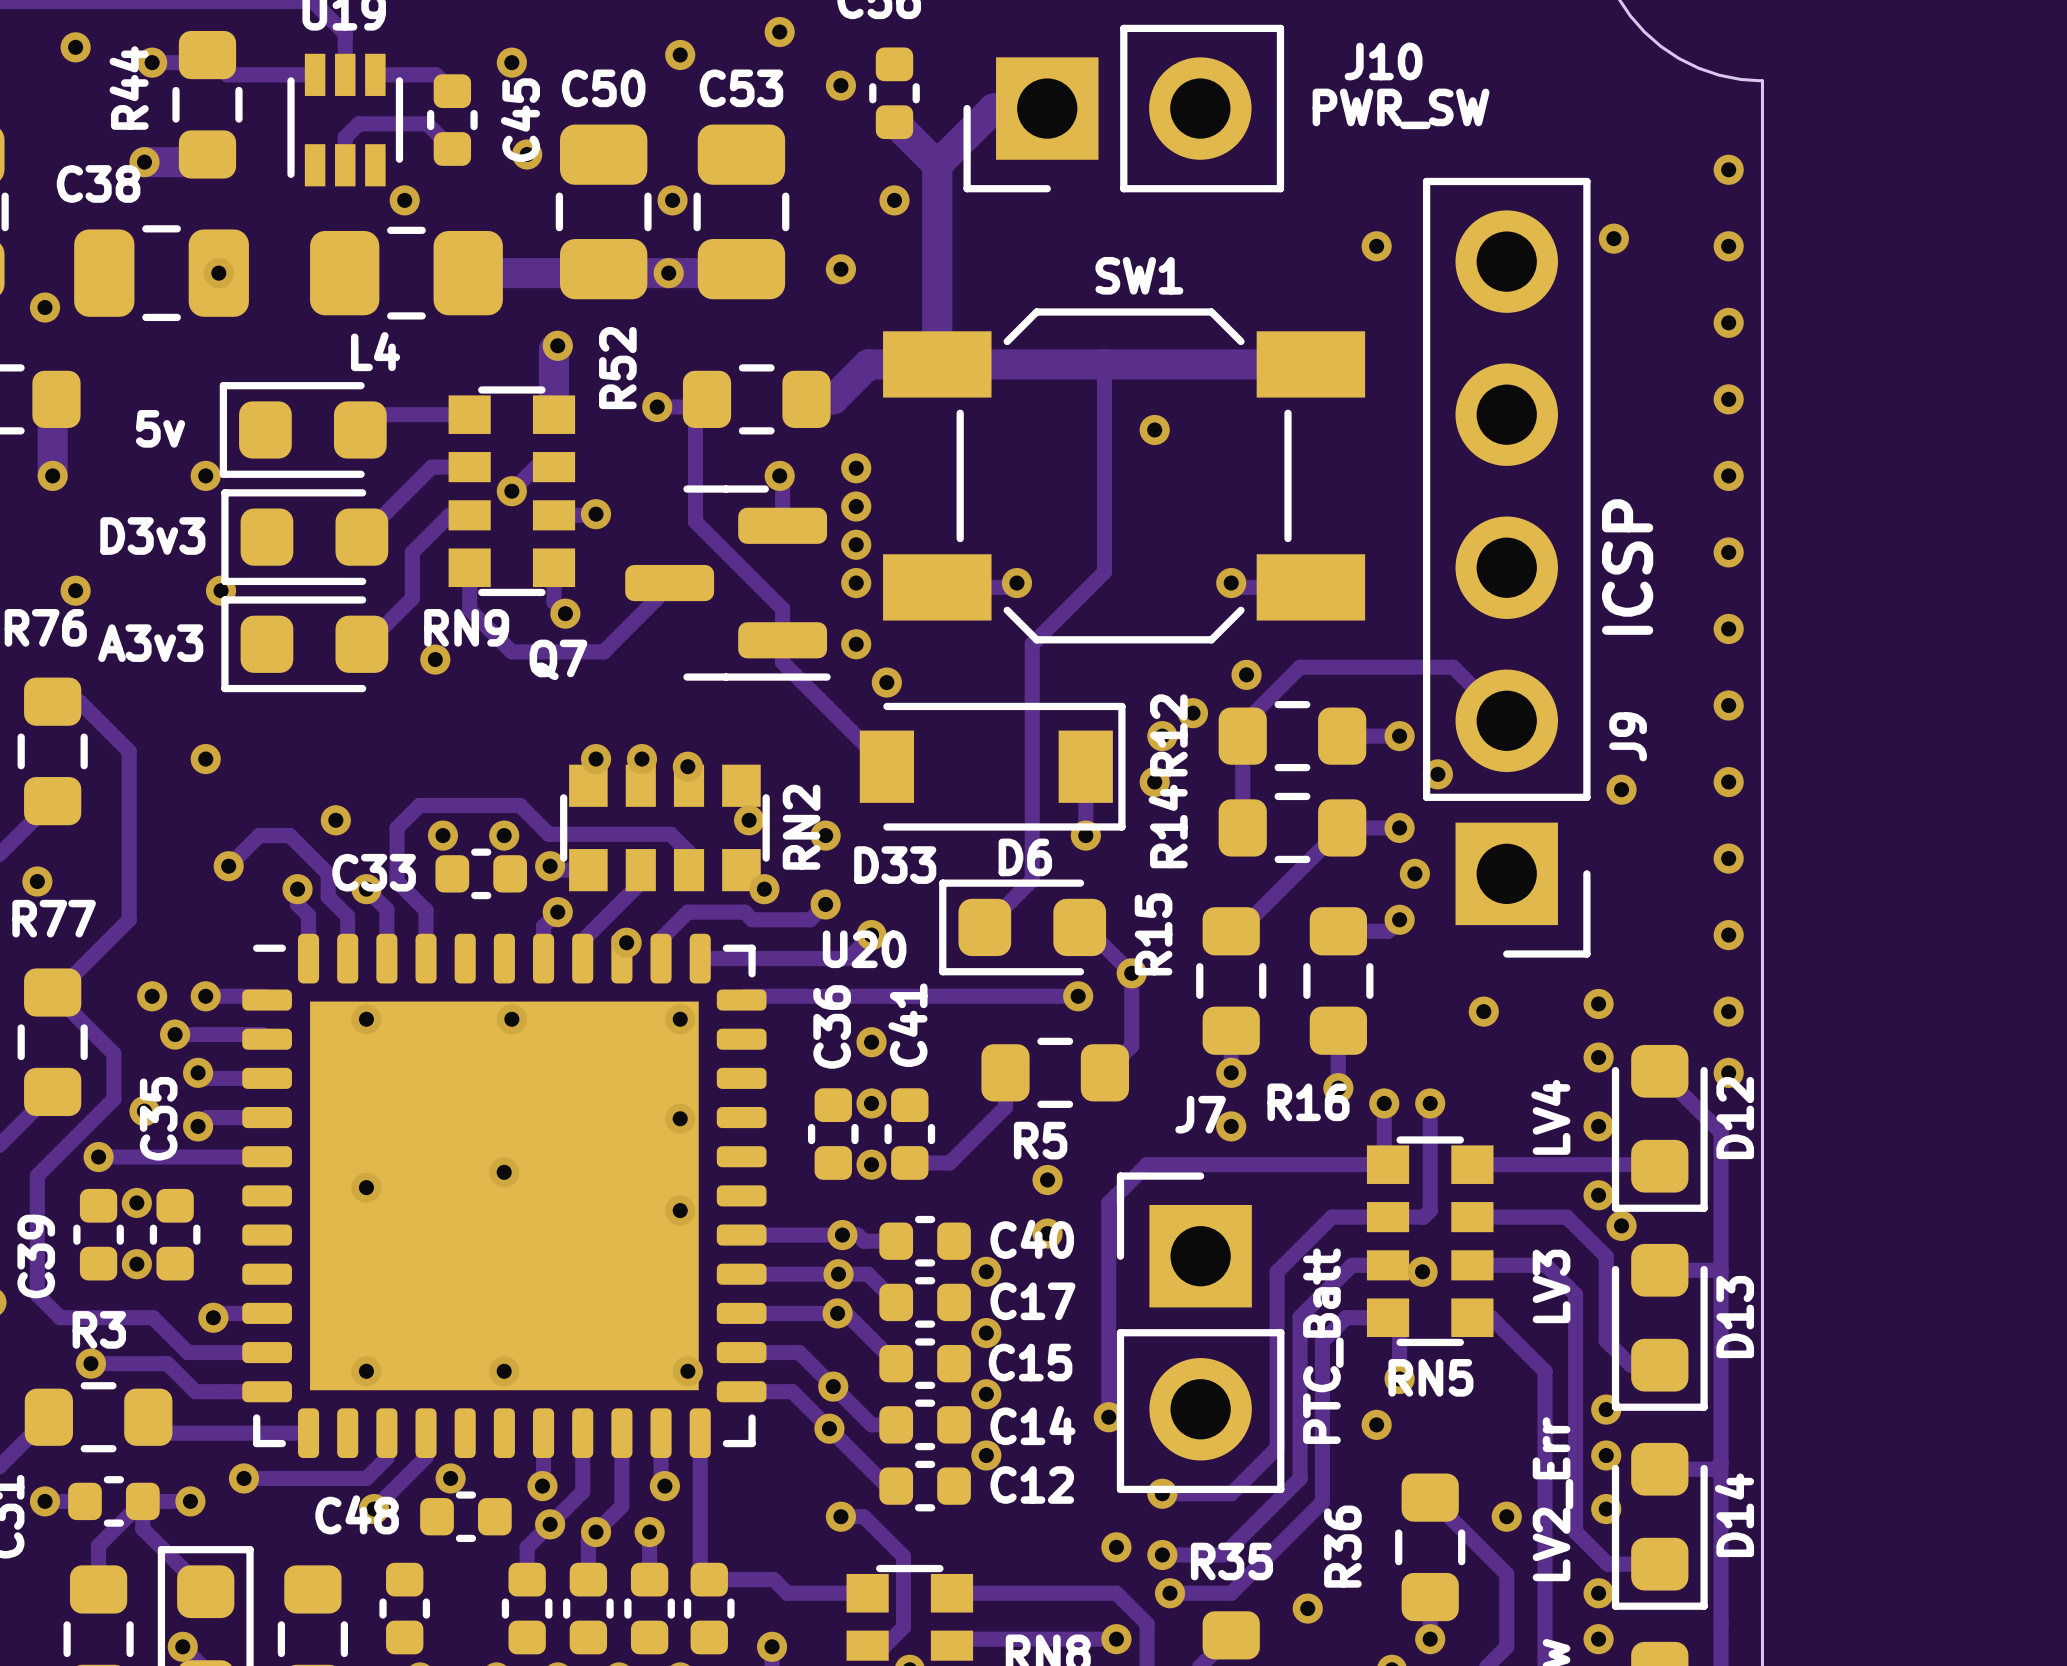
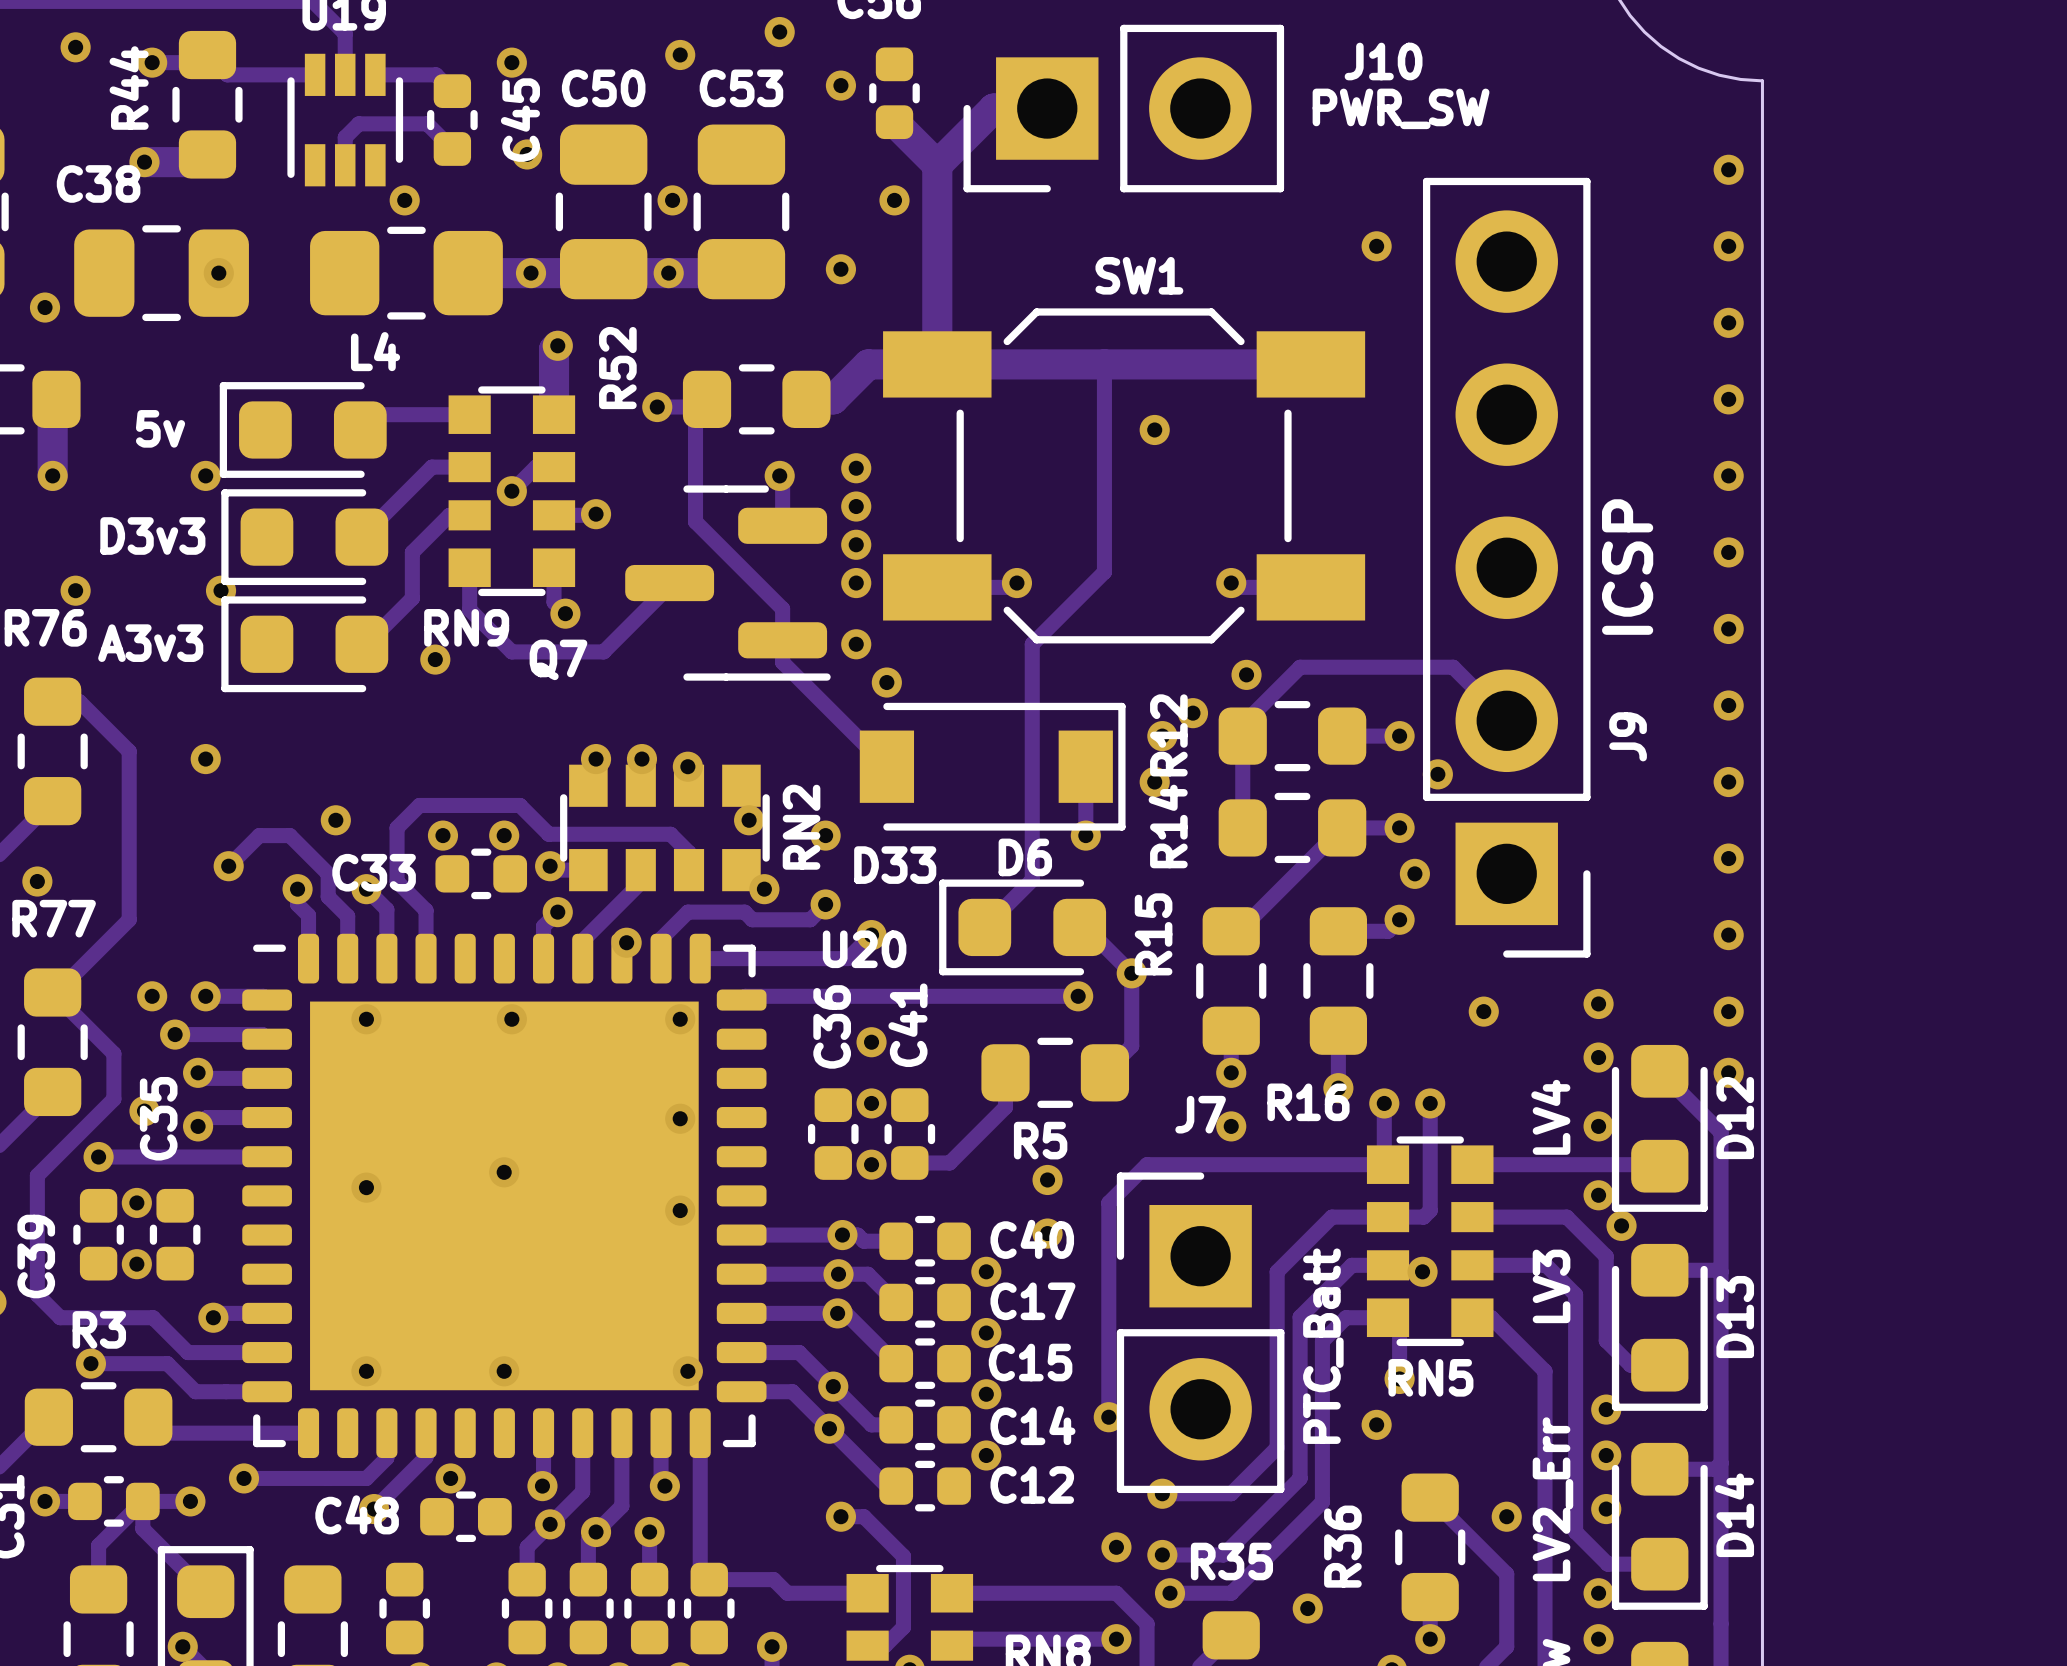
via: (1613, 238) -> none
via: none -> (531, 273)
via: (1621, 789) -> none

